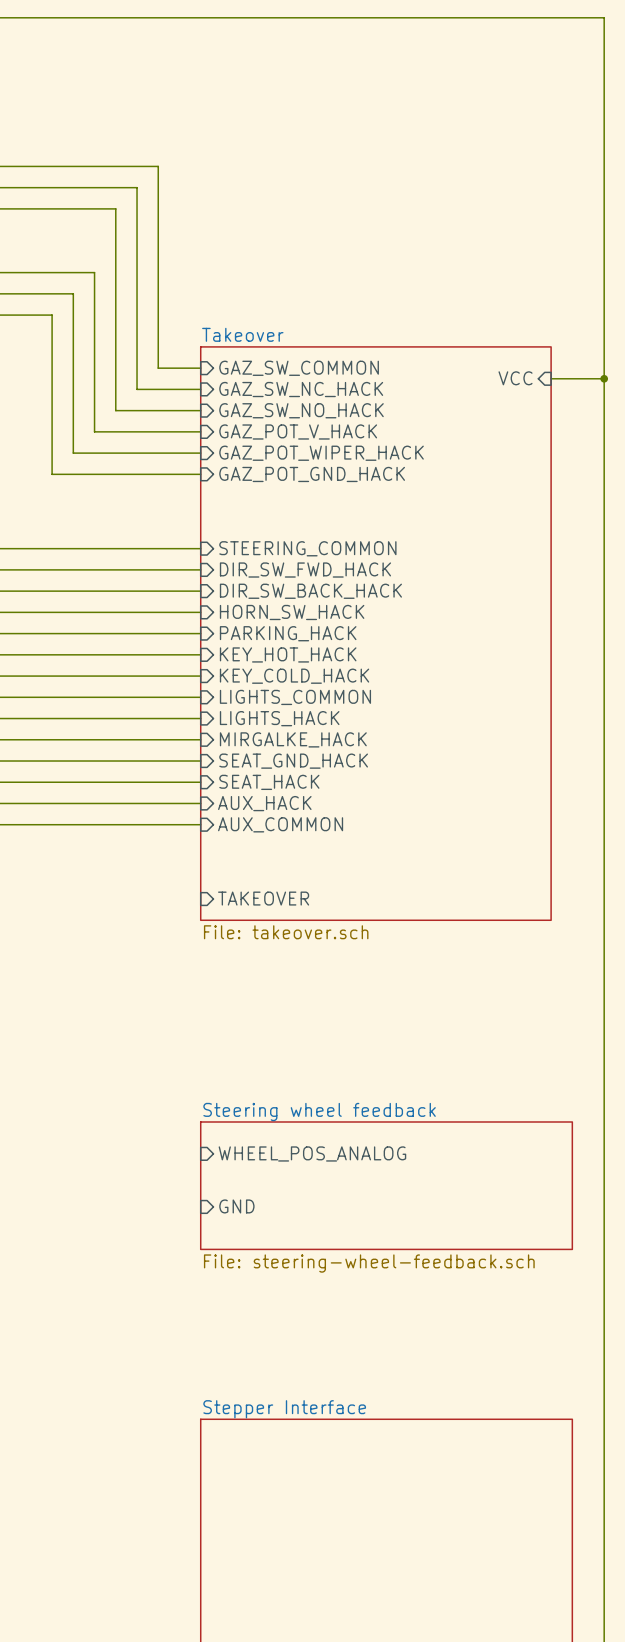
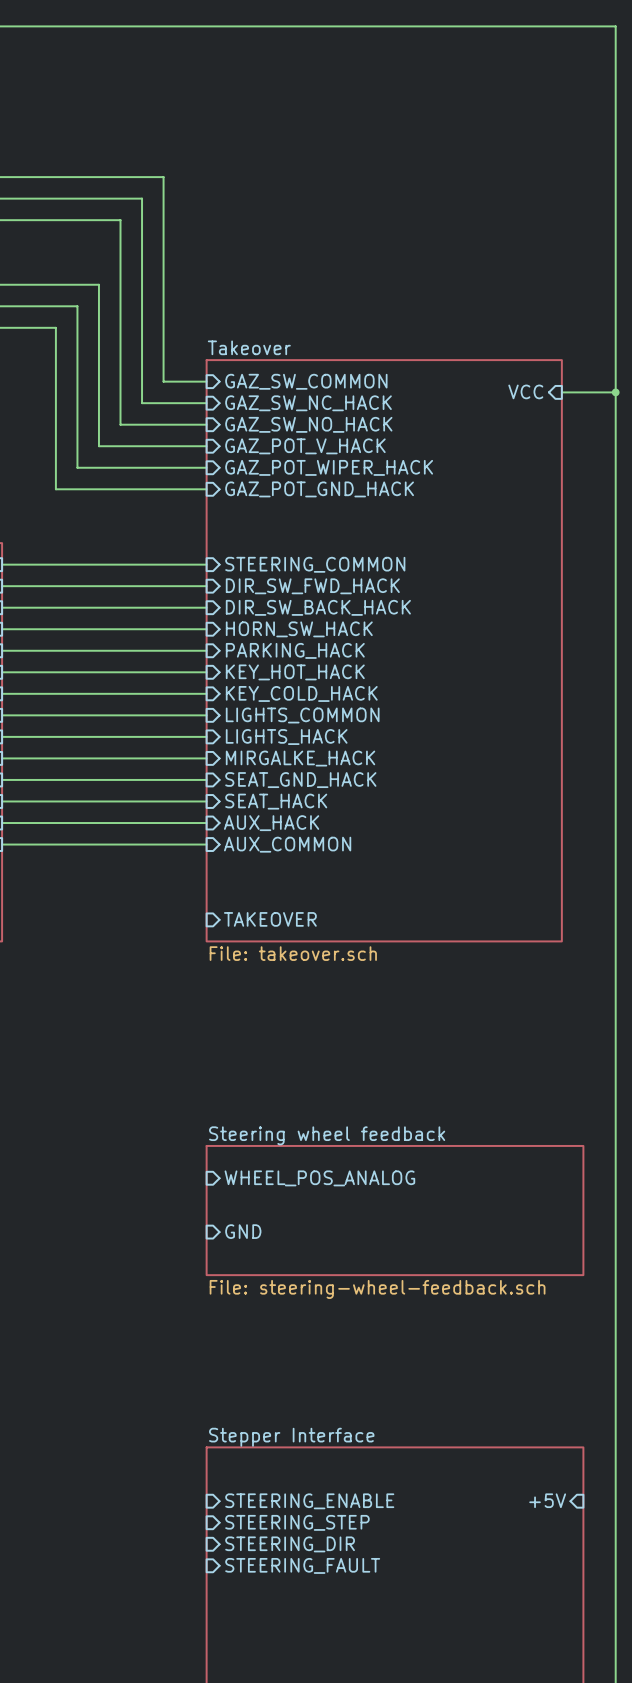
sheet pin: none -> +5V (547, 1500)
sheet pin: none -> STEERING_ENABLE (309, 1501)
sheet pin: none -> STEERING_STEP (297, 1522)
sheet pin: none -> STEERING_DIR (290, 1544)
sheet pin: none -> STEERING_FAULT (302, 1565)

